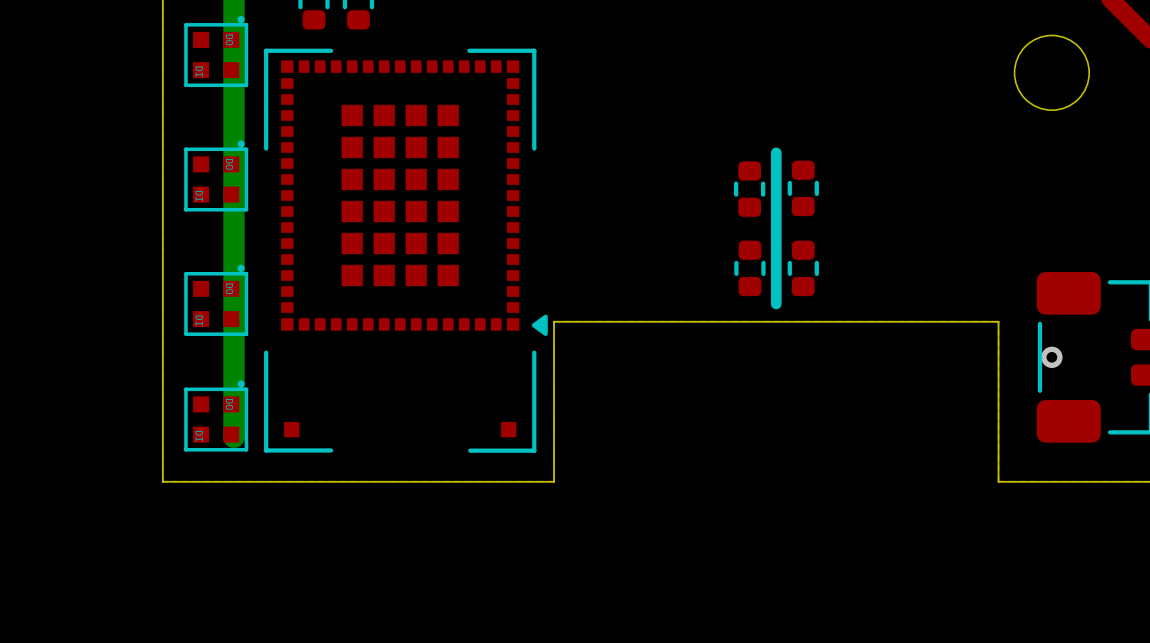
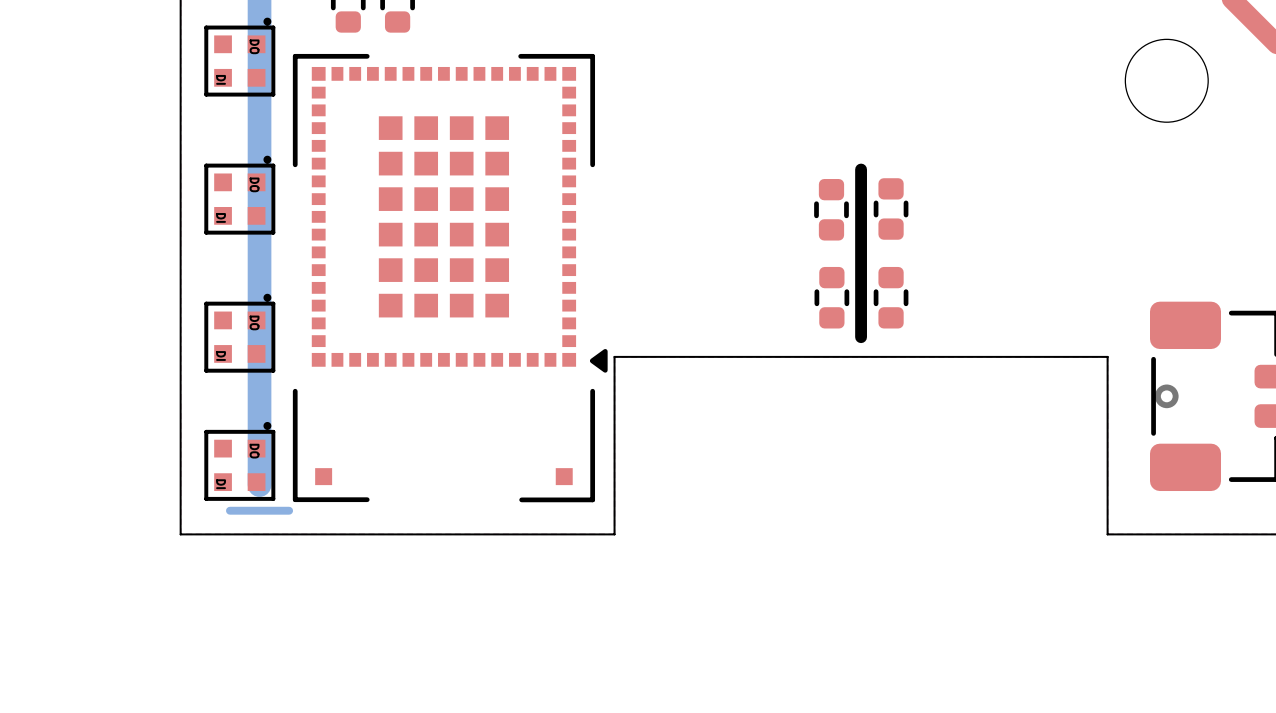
bottom track: none -> (229, 510) (289, 510)

